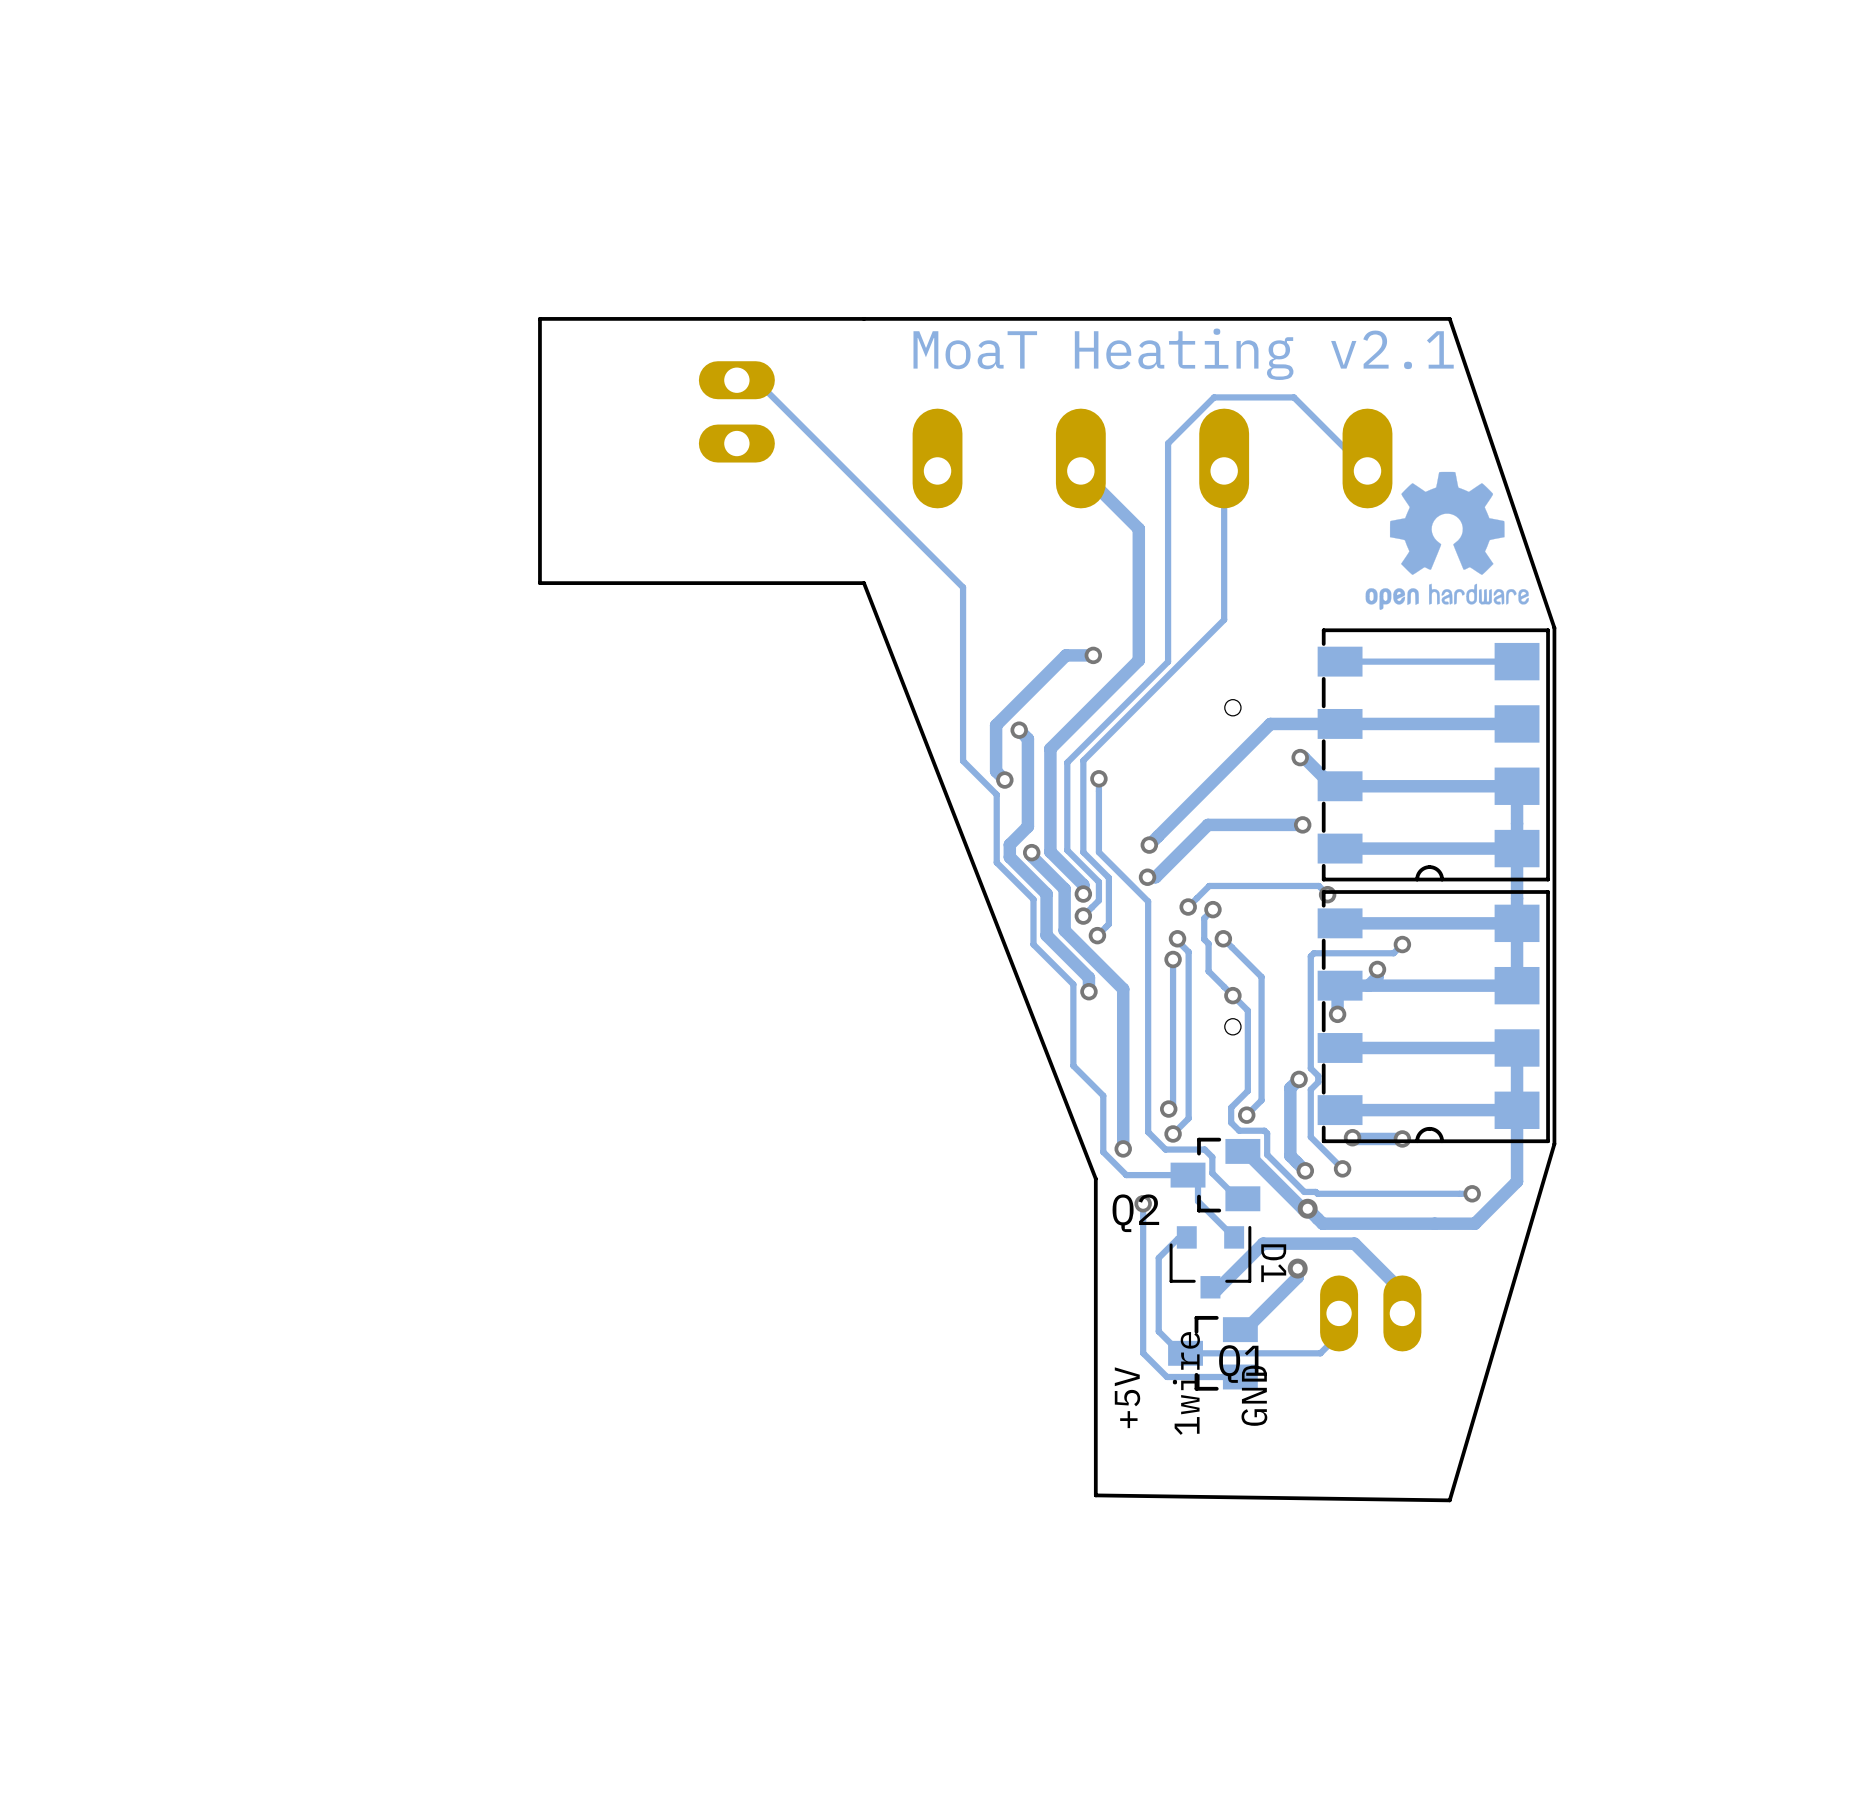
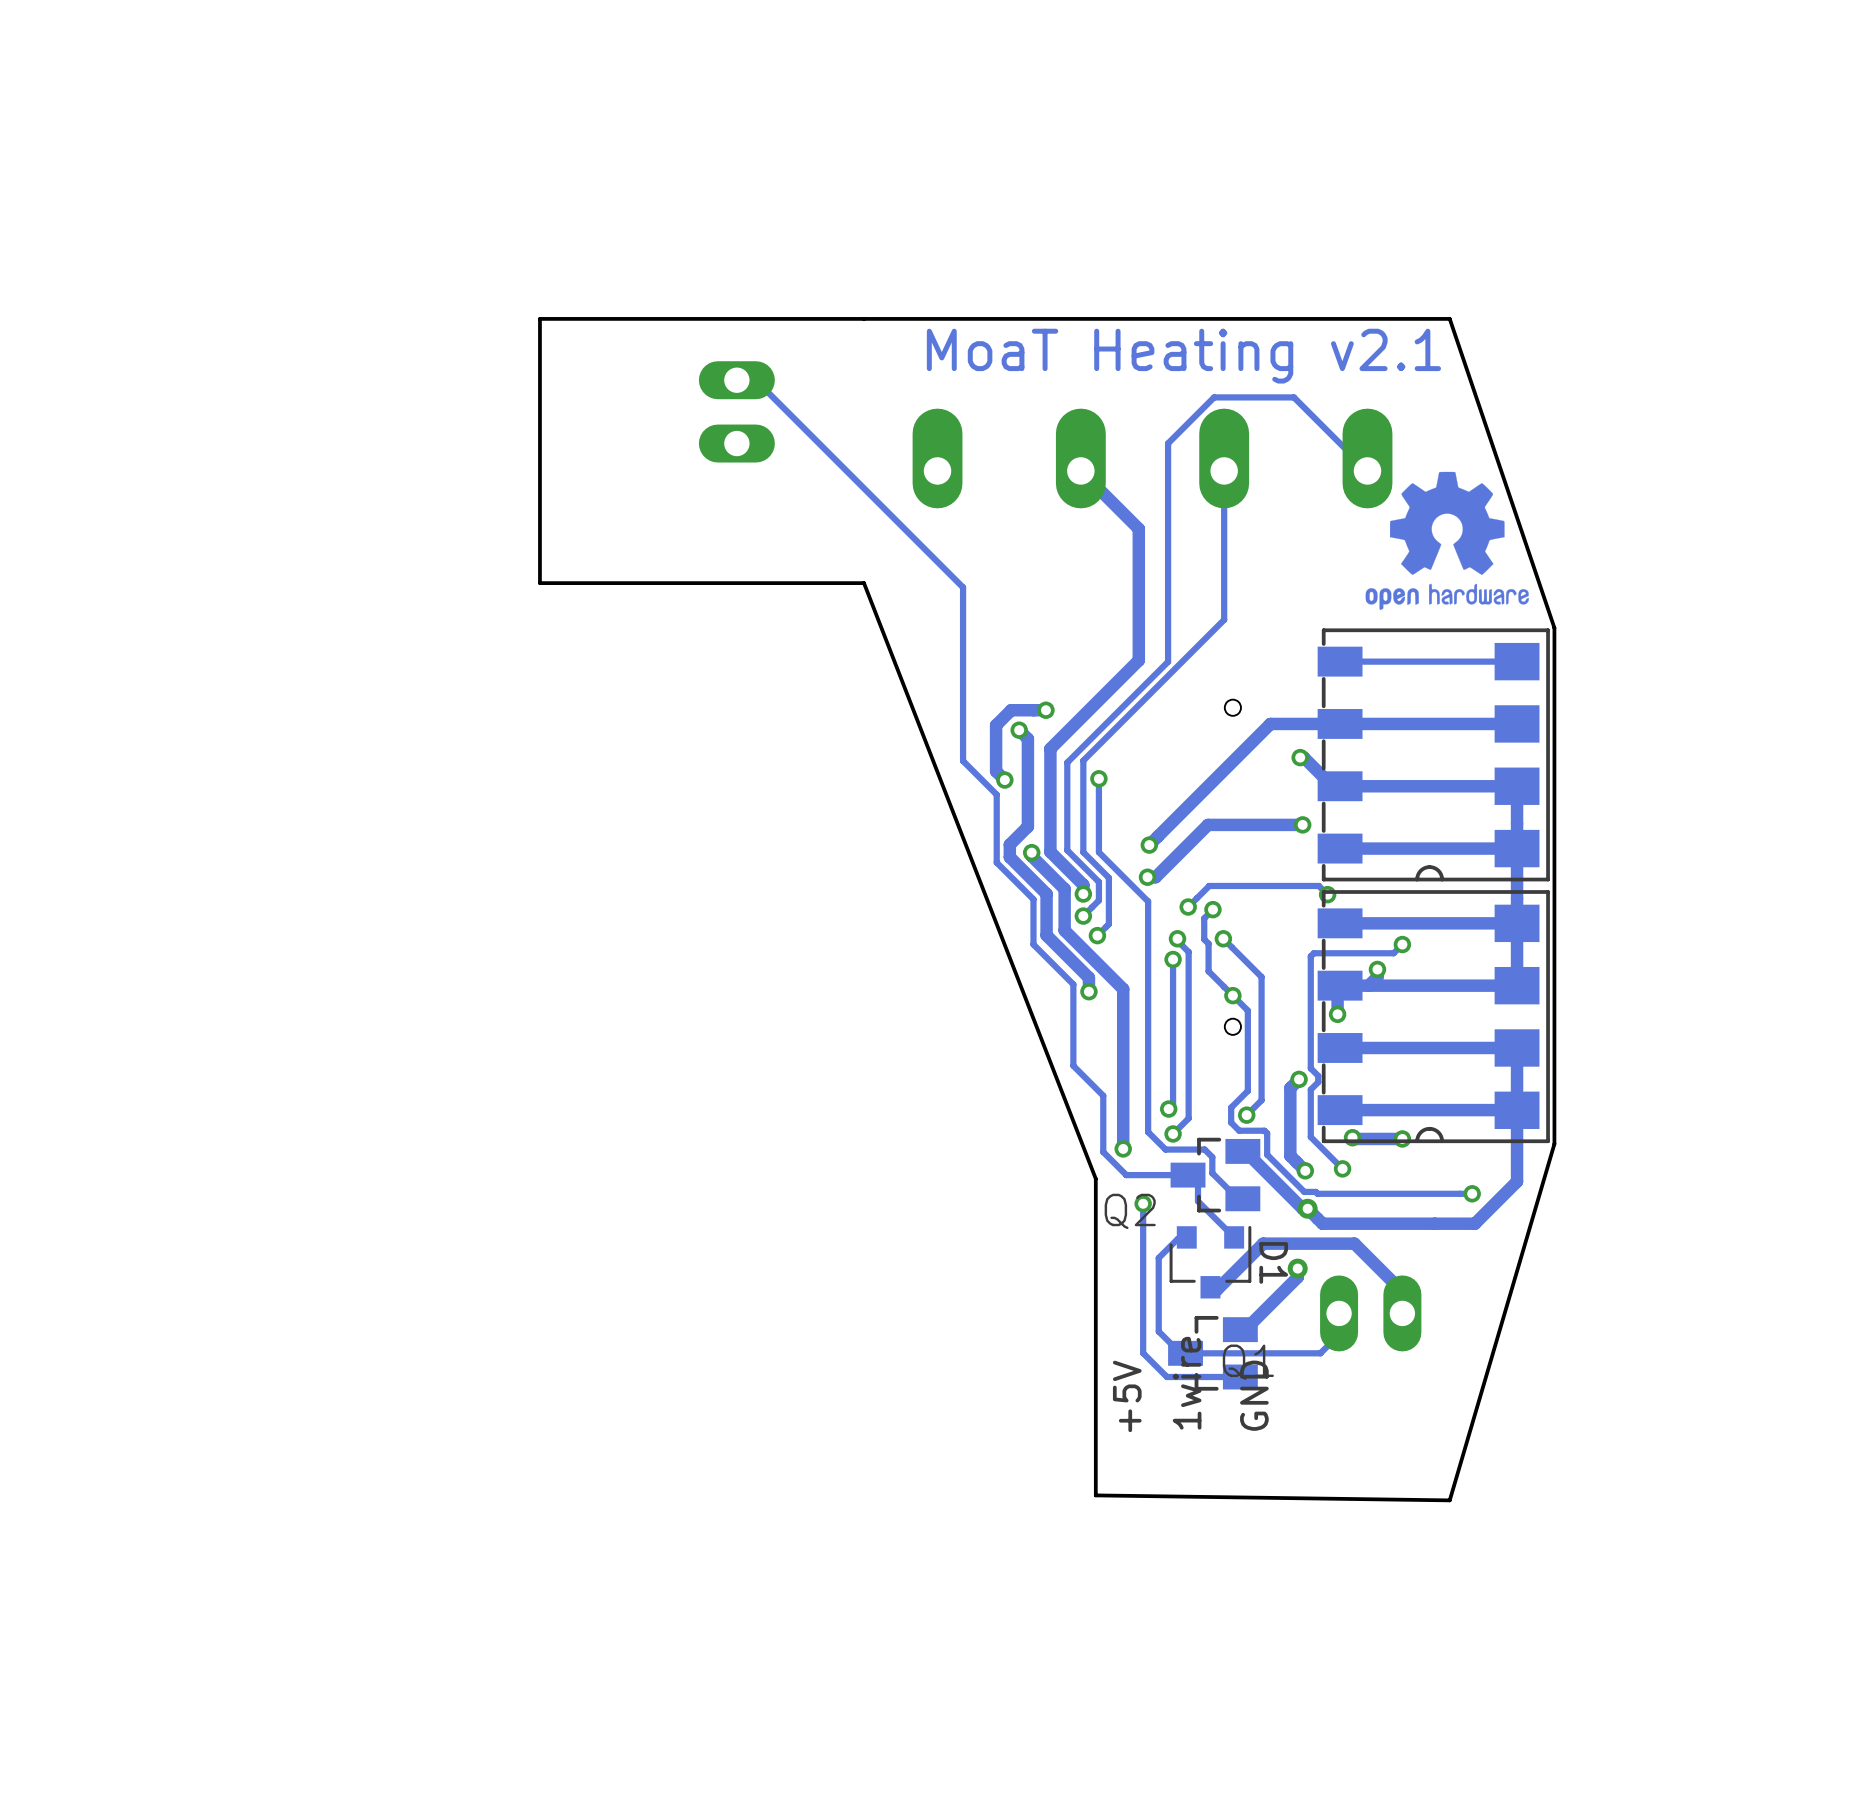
track: (1093, 655) (1066, 655) (1011, 710) -> (1045, 710) (1011, 710)
via position: (1093, 655) -> (1045, 710)

